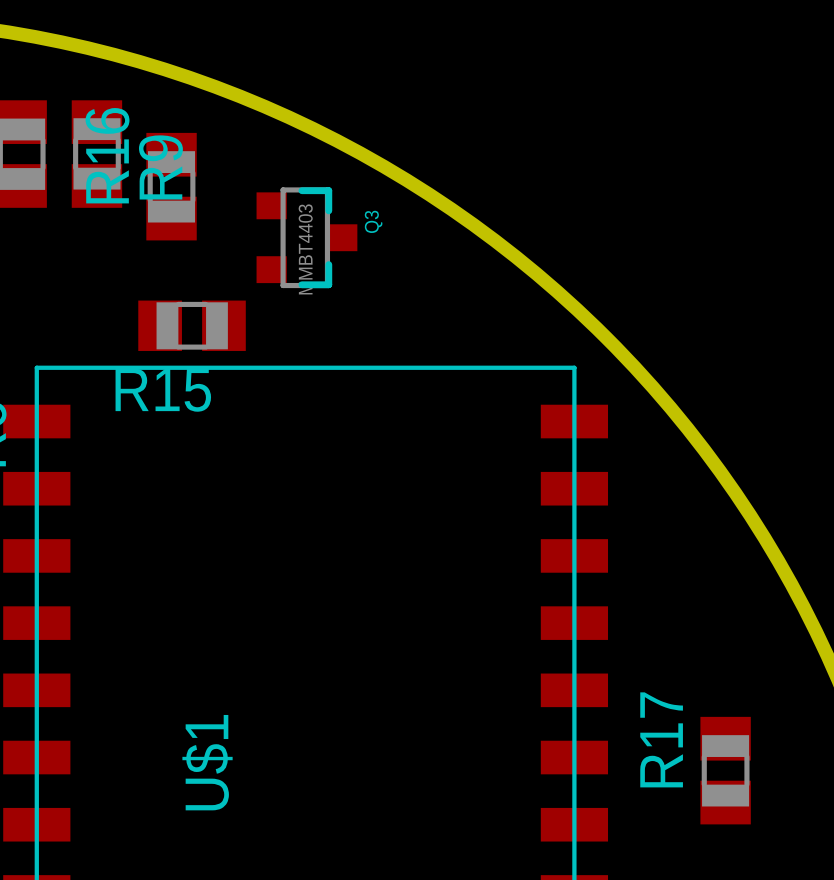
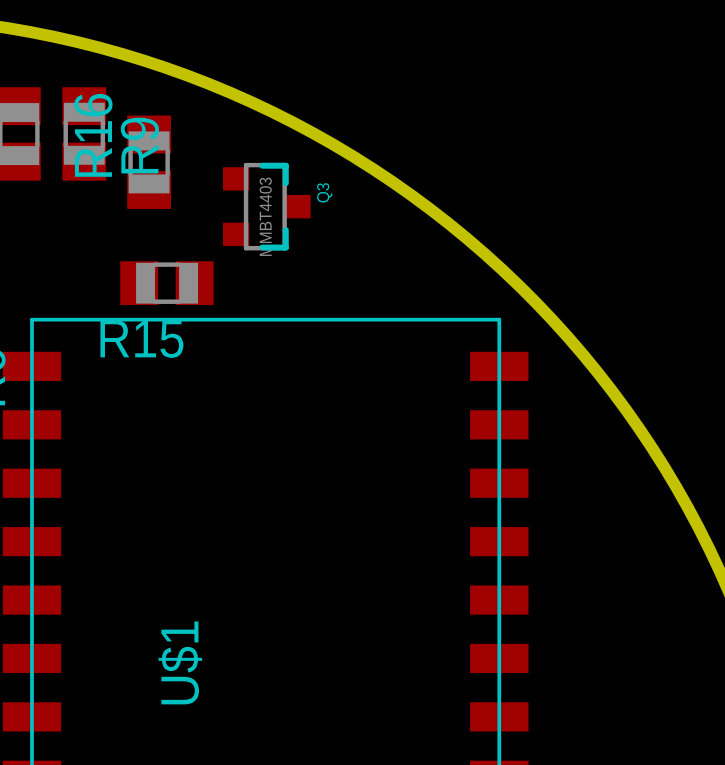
R17: (725, 770) -> none

